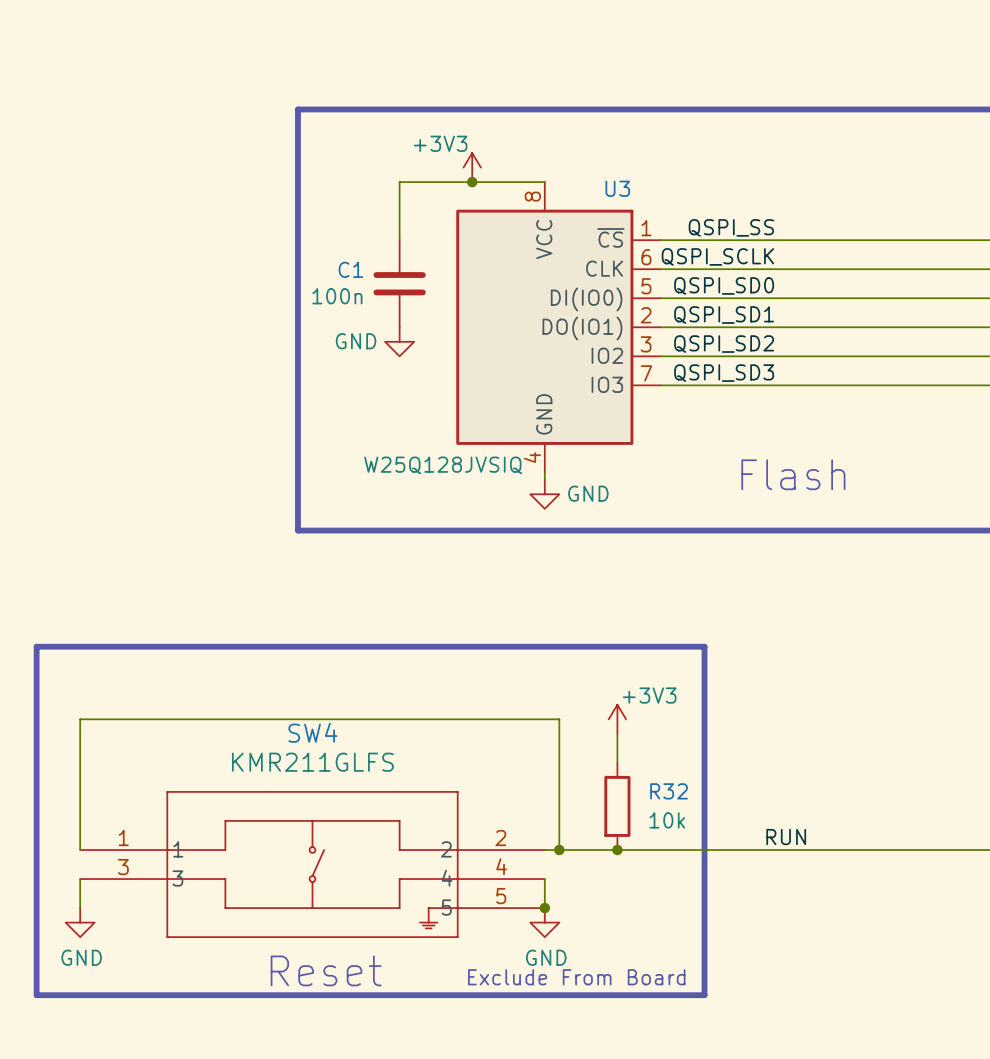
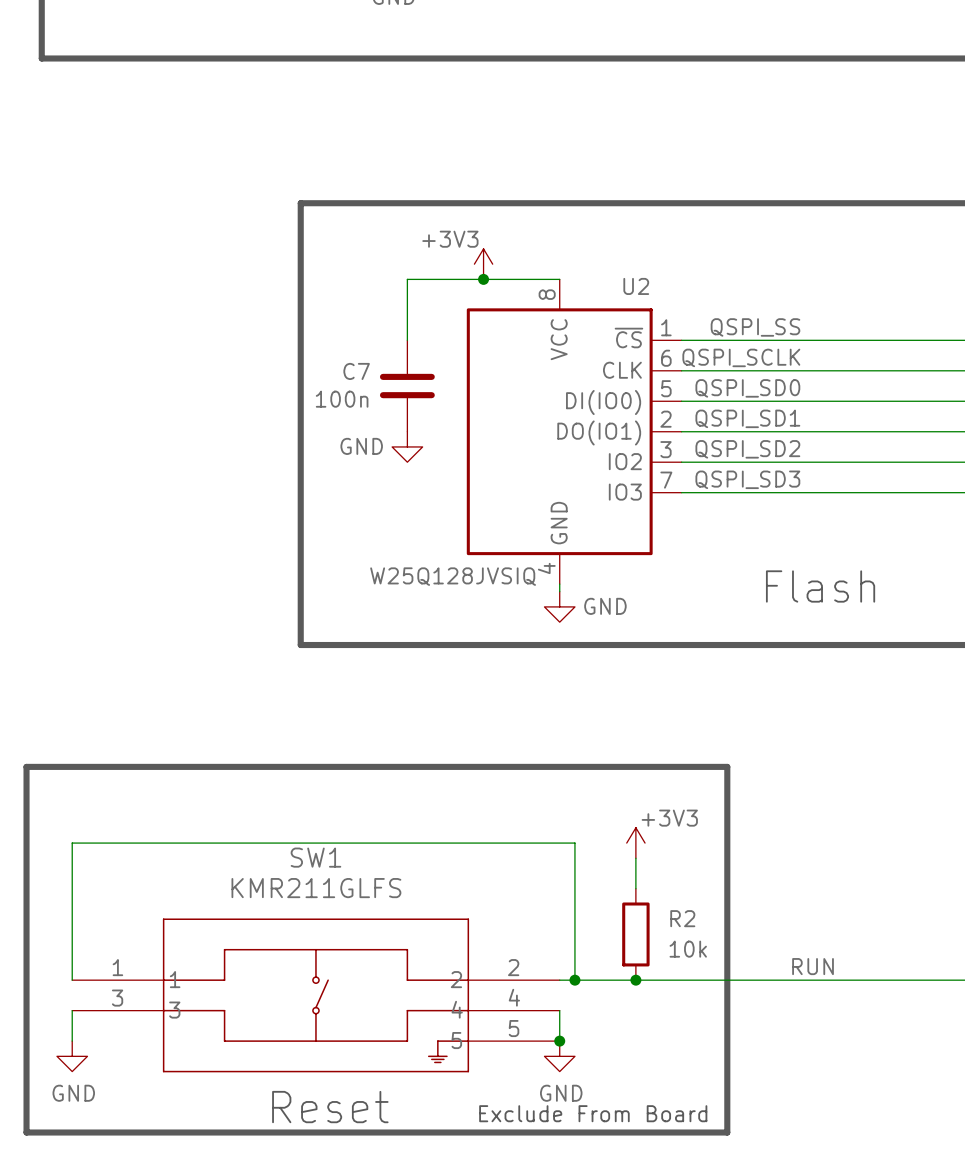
U3 name: U3 (617, 188) -> U2 (636, 286)
C1 name: C1 (350, 269) -> C7 (356, 371)
SW4 name: SW4 (312, 732) -> SW1 (315, 857)
R32 name: R32 (669, 791) -> R2 (682, 918)

